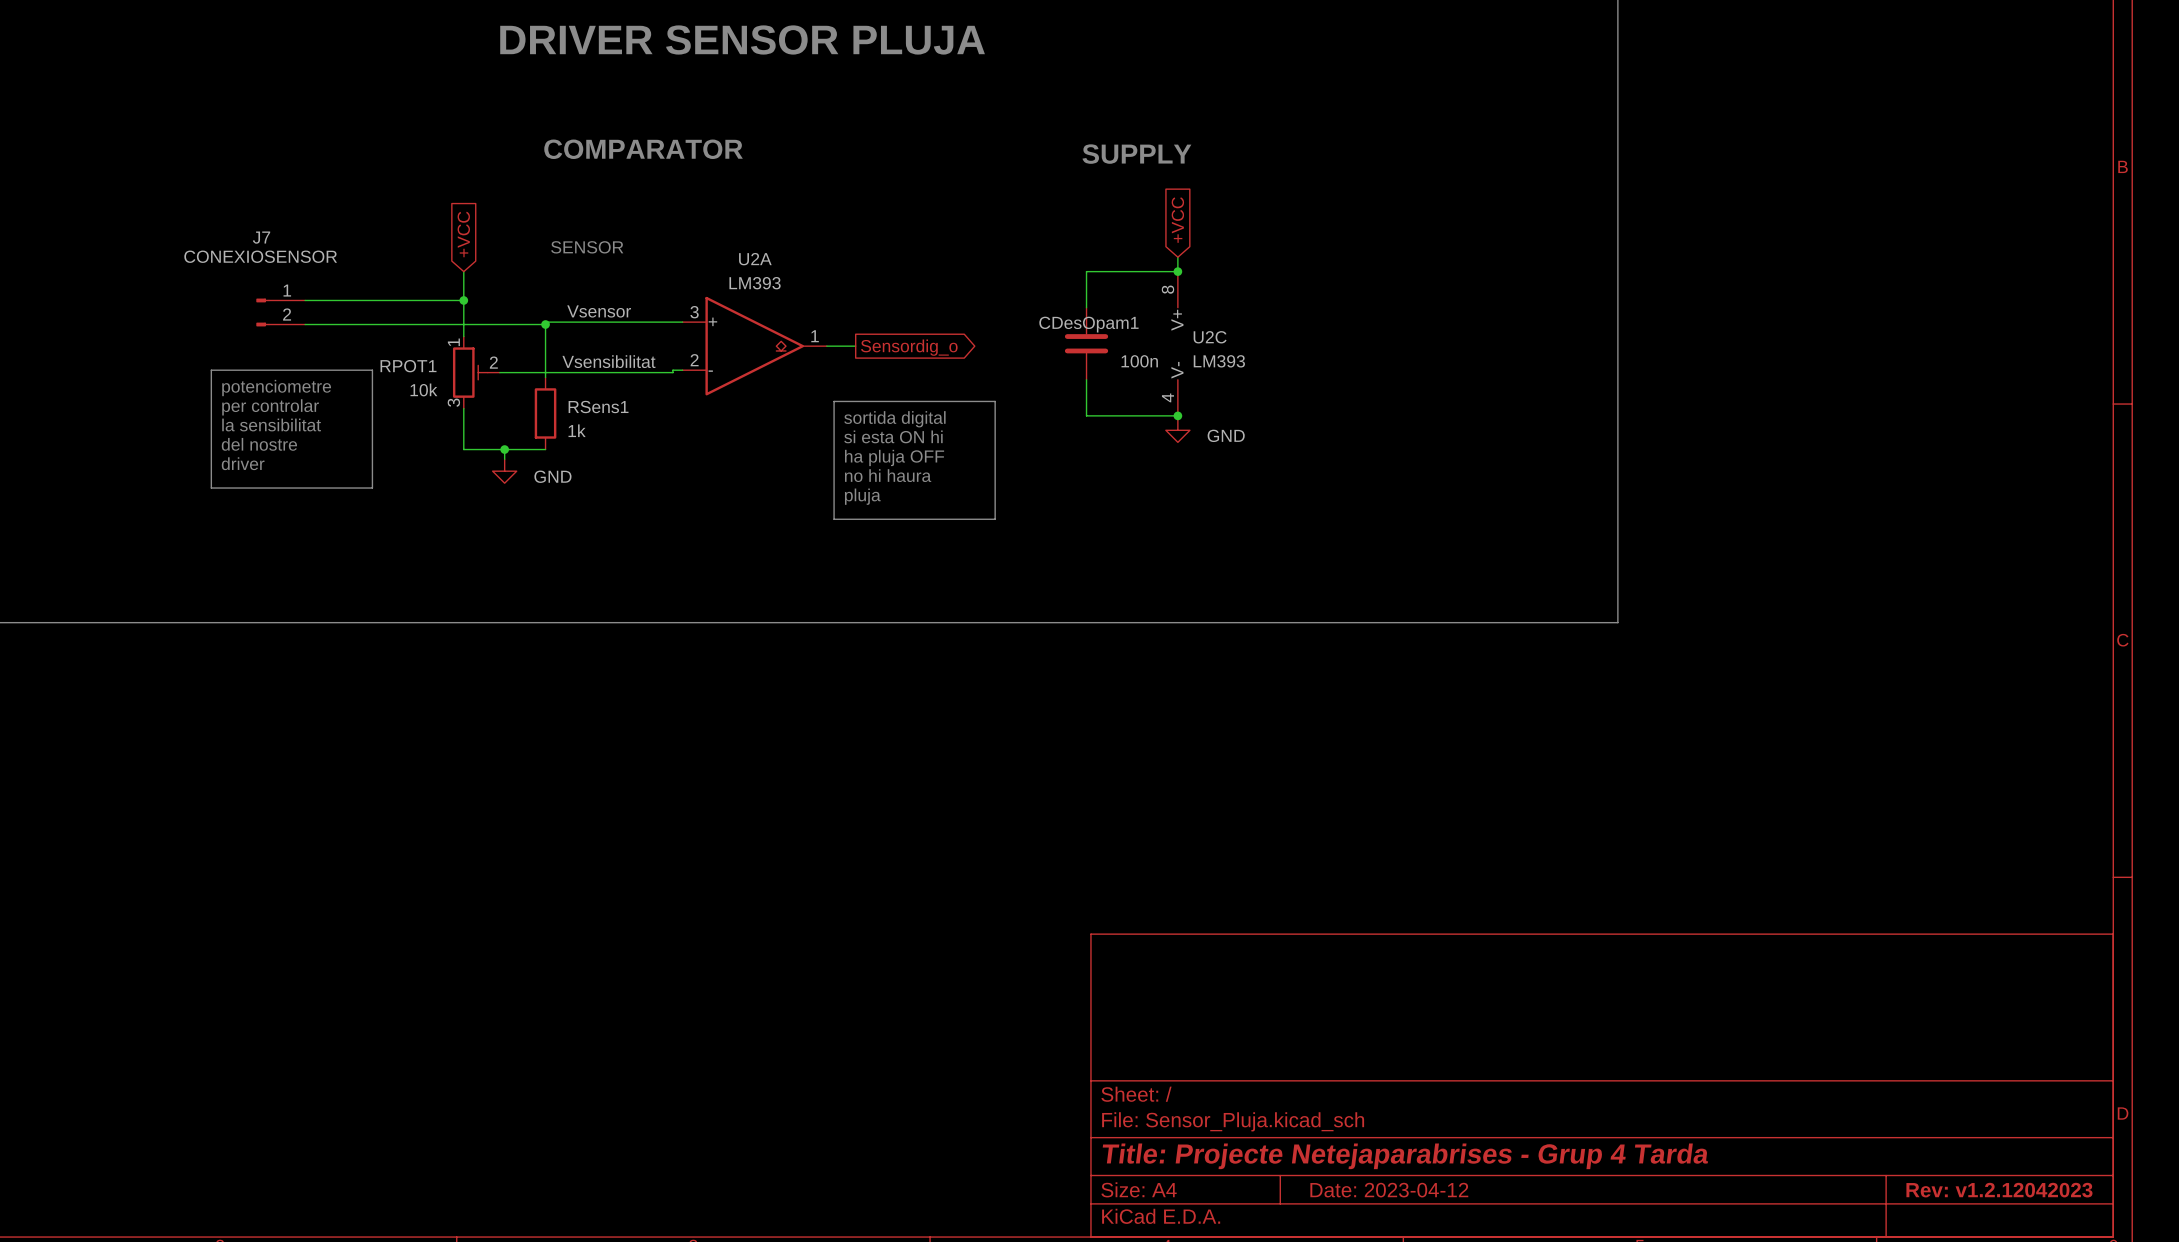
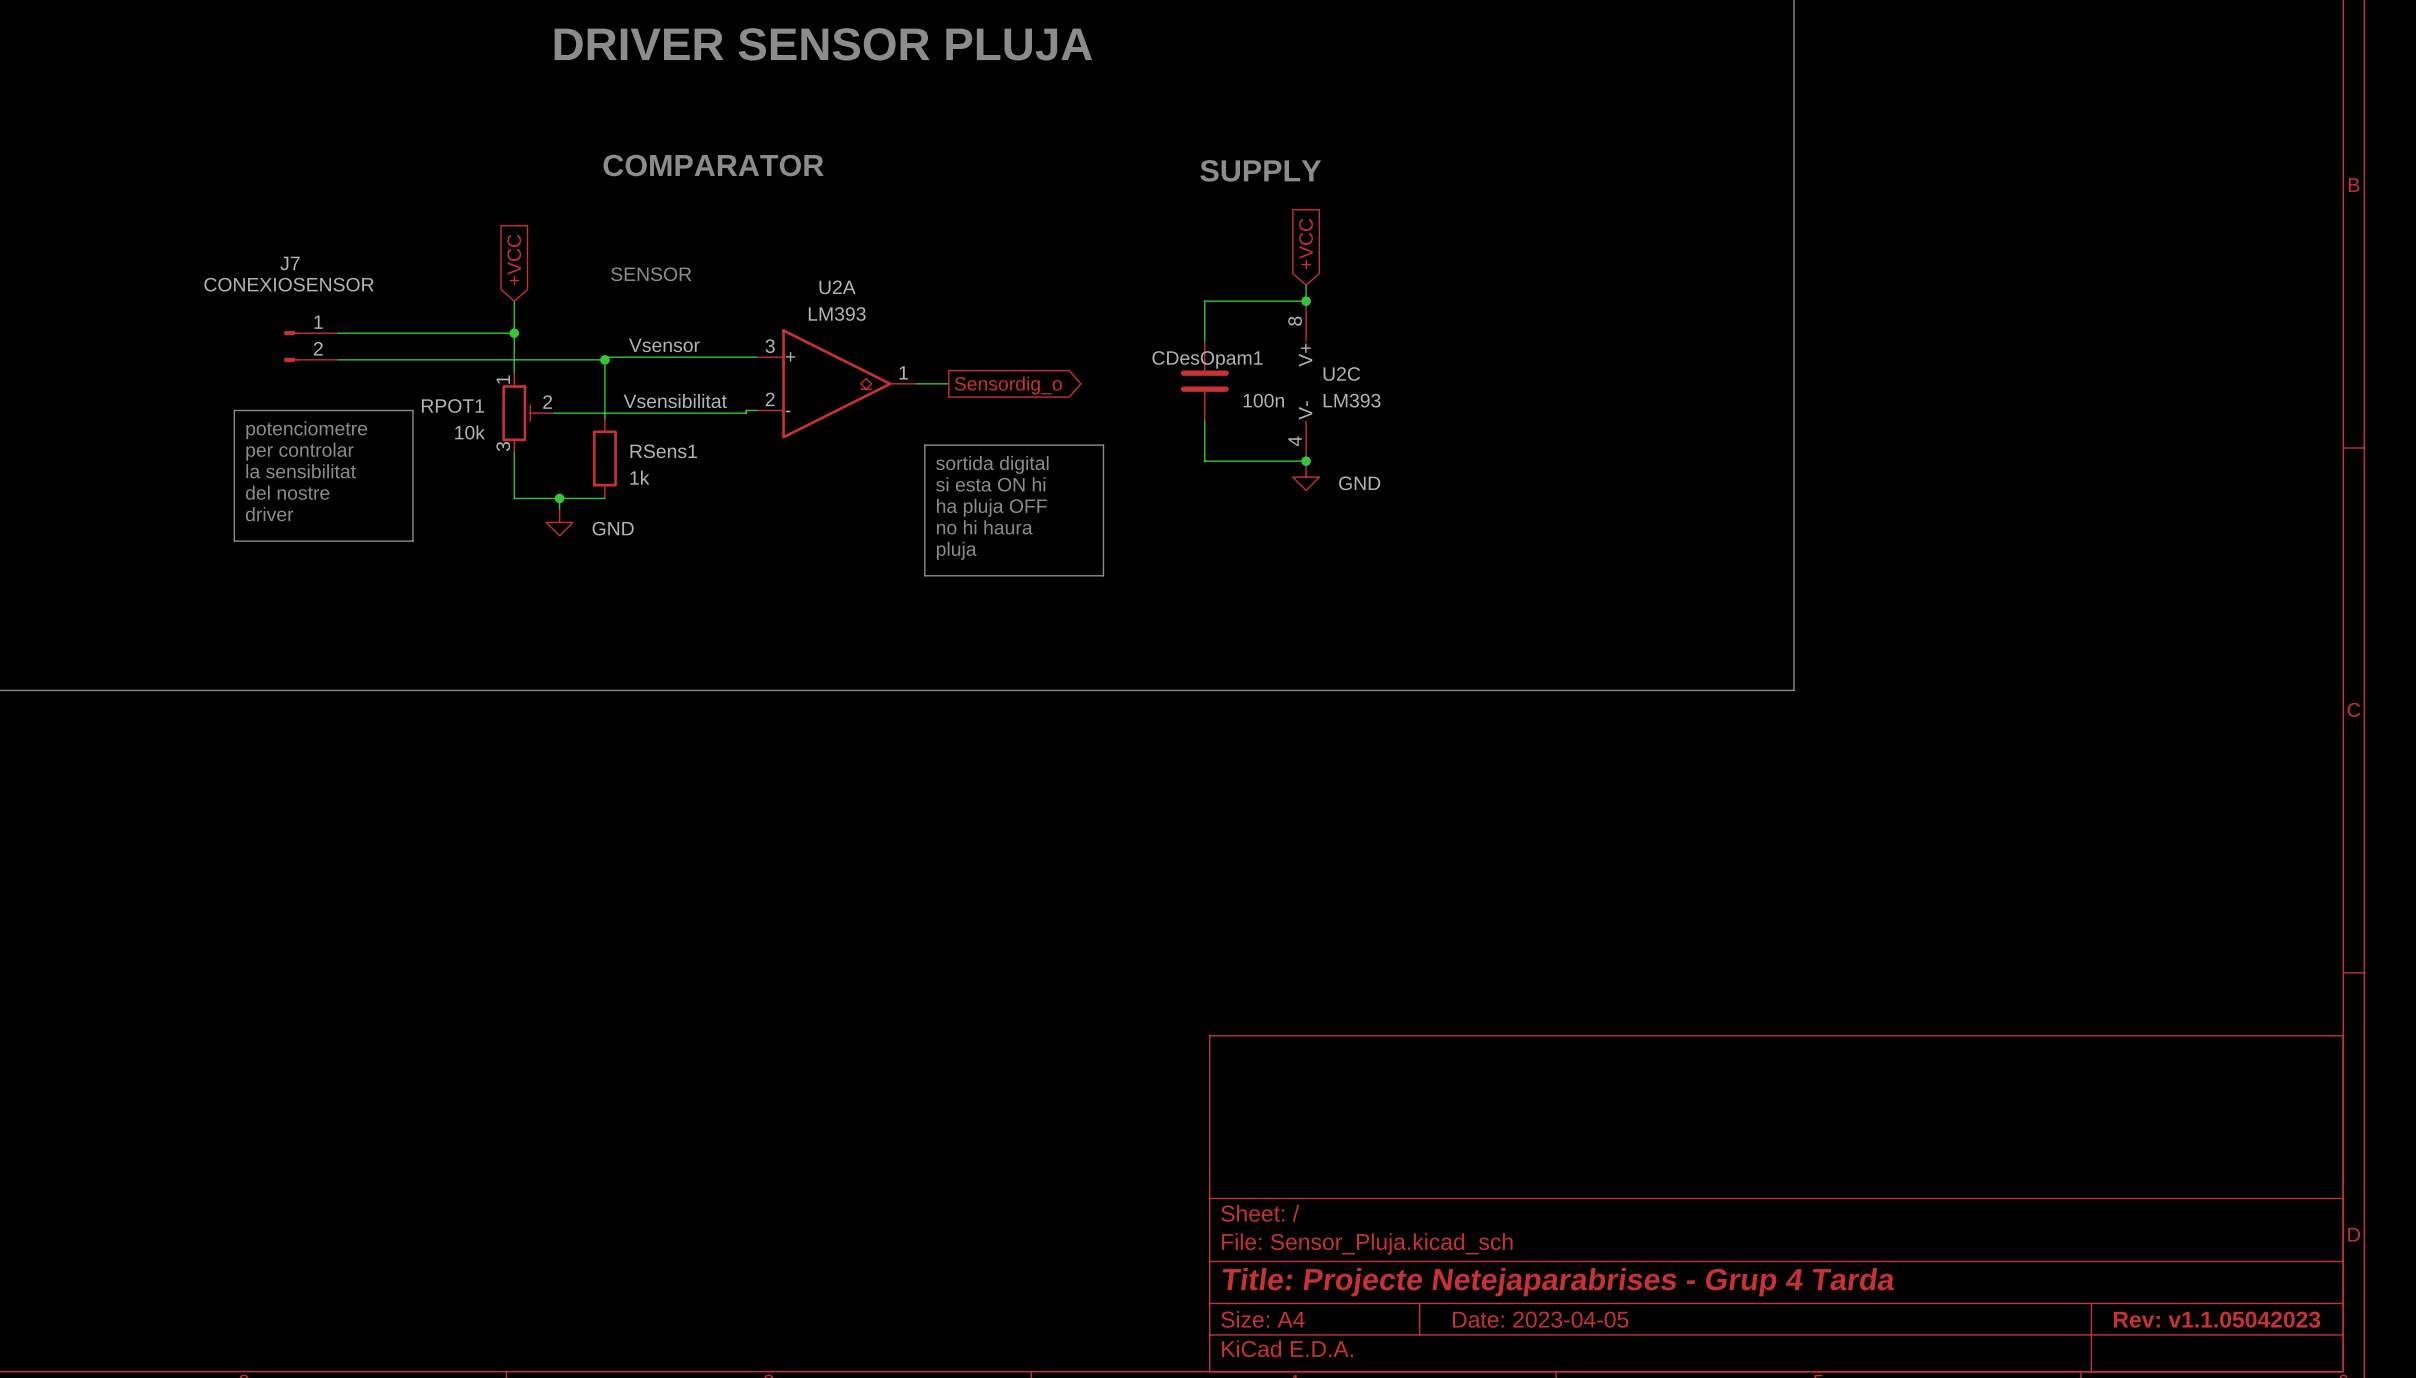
title block: Date: 2023-04-12 (1389, 1190) -> Date: 2023-04-05 (1540, 1319)
title block: Rev: v1.2.12042023 (1999, 1190) -> Rev: v1.1.05042023 (2217, 1319)

